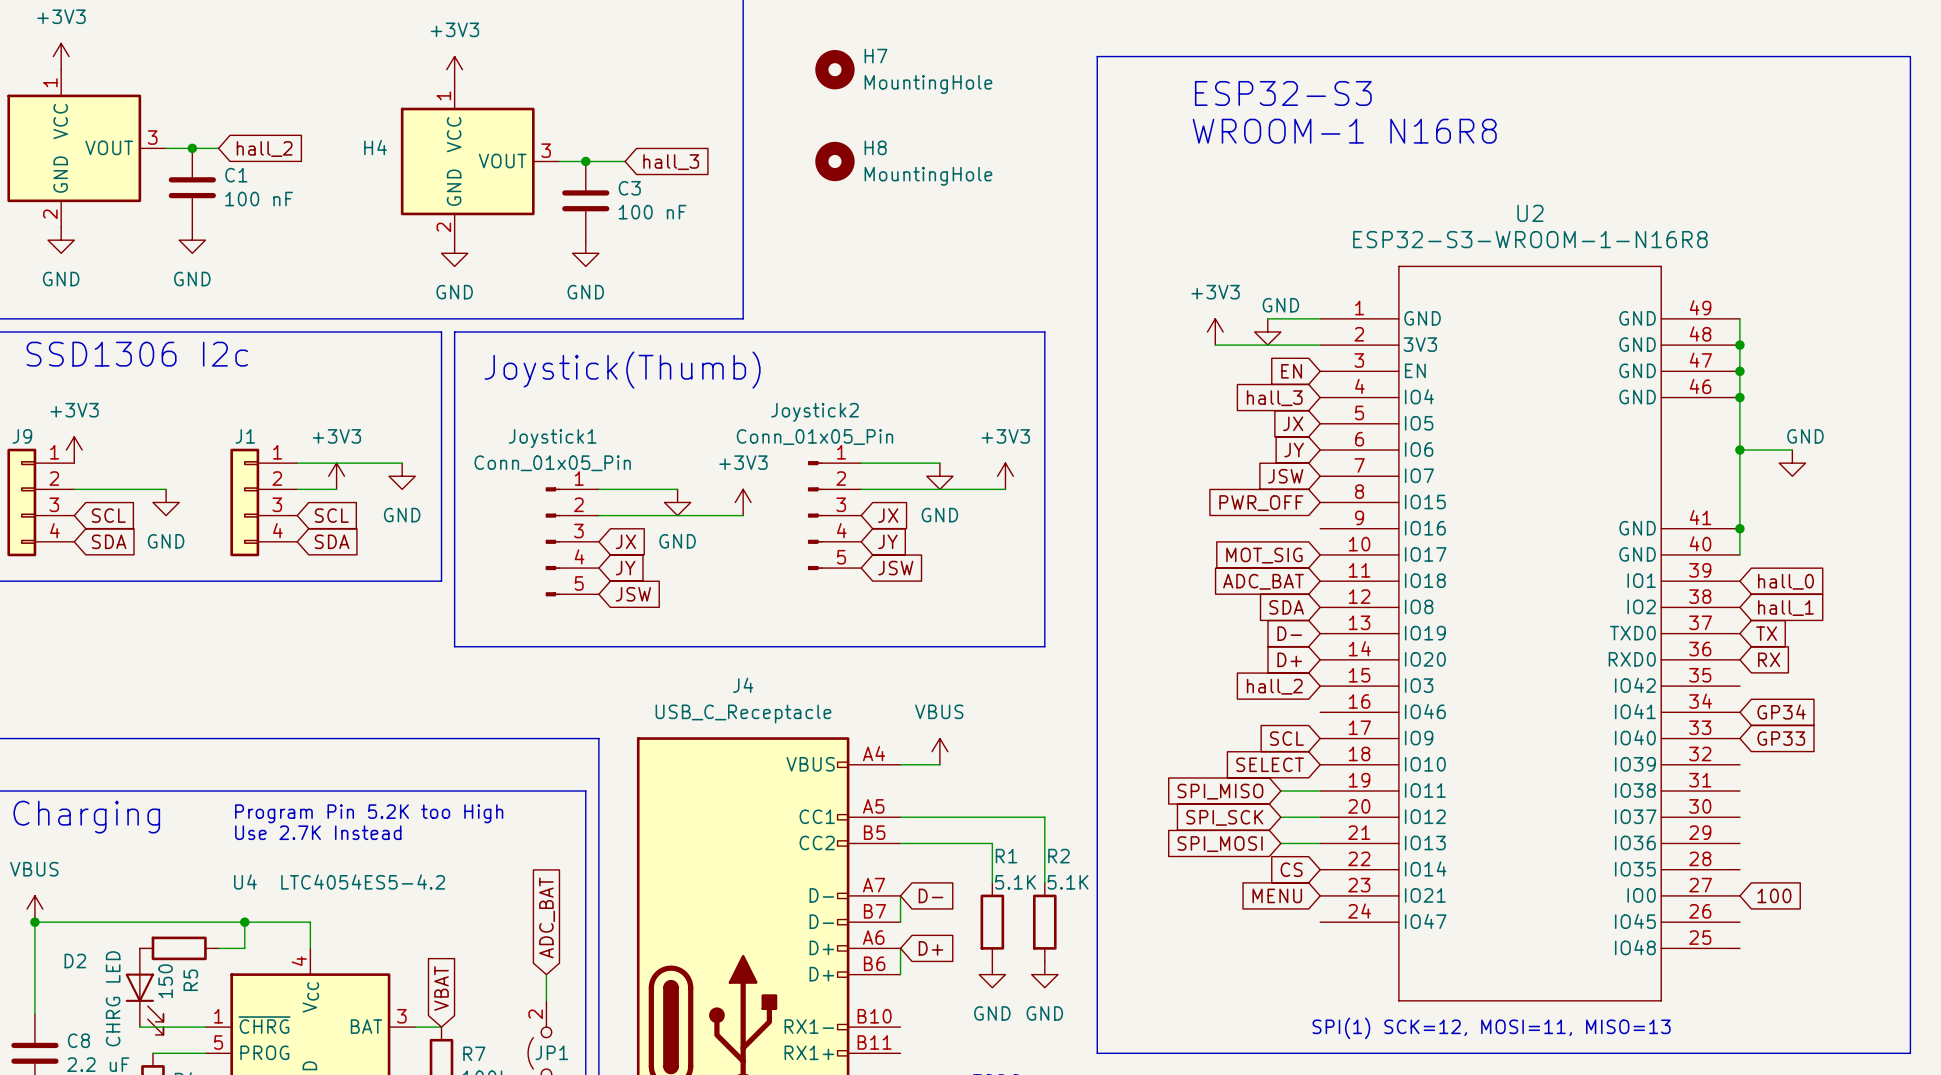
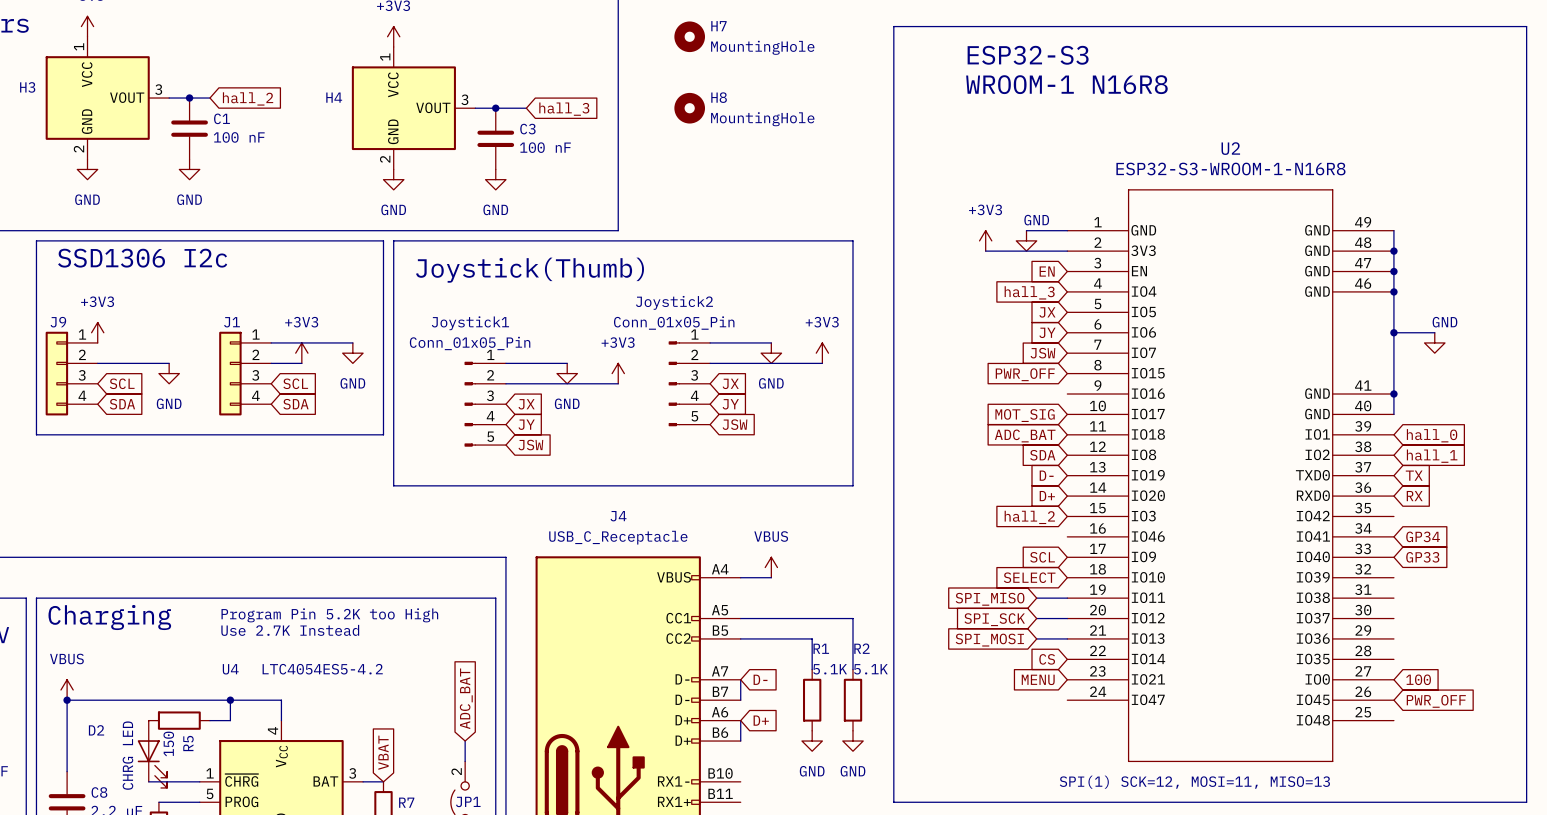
global label: none -> PWR_OFF (1436, 701)

